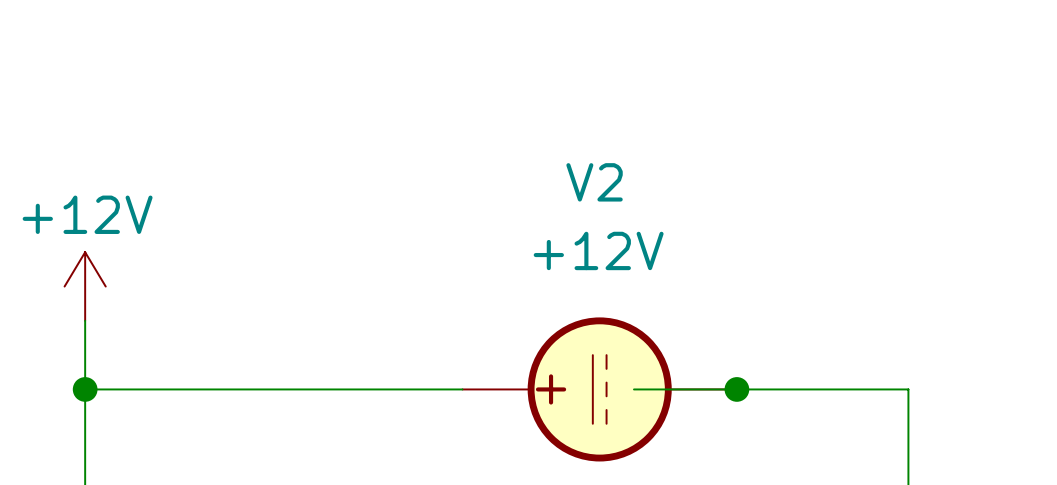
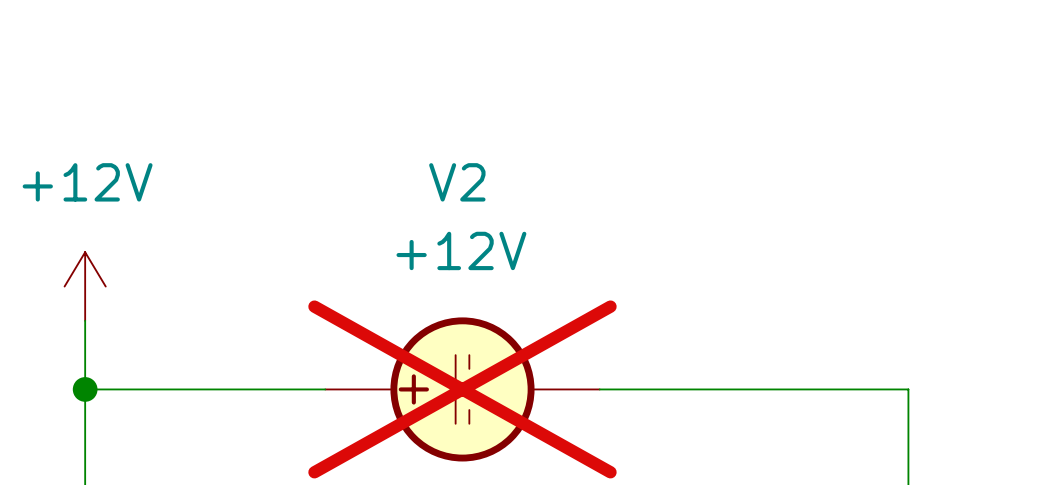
power symbol text position: +12V (87, 214) -> +12V (87, 182)
V2 do-not-place cross: none -> (462, 389)
V2 position: (599, 389) -> (462, 389)
junction: (736, 389) -> none

